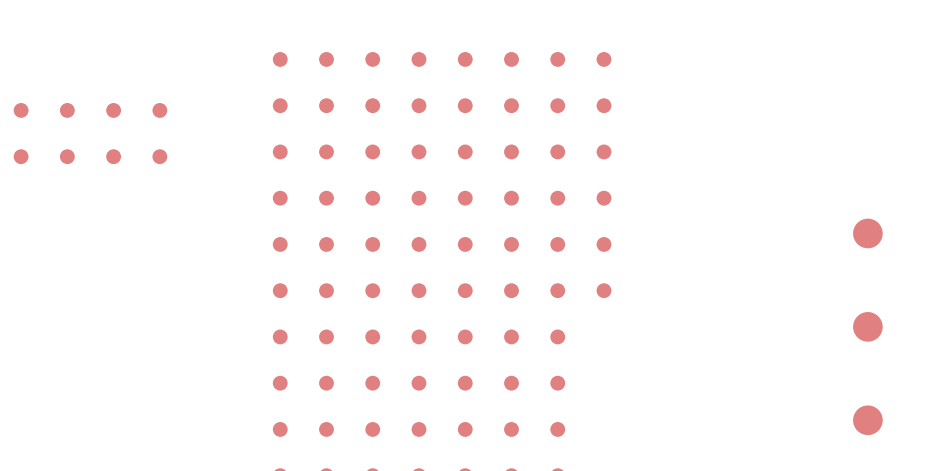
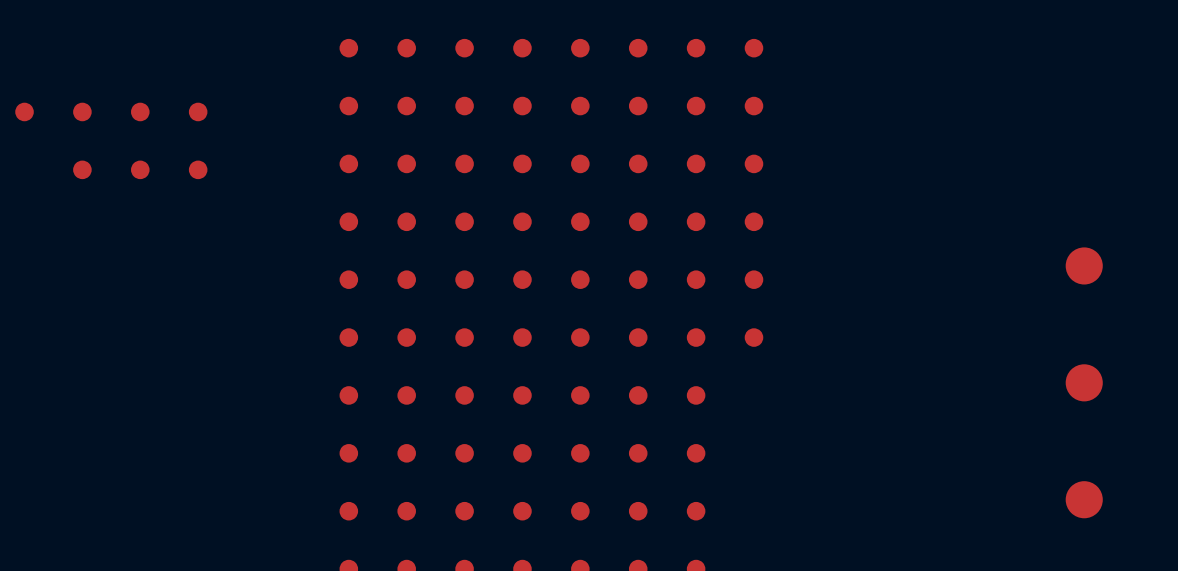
part: (21, 156) -> none

